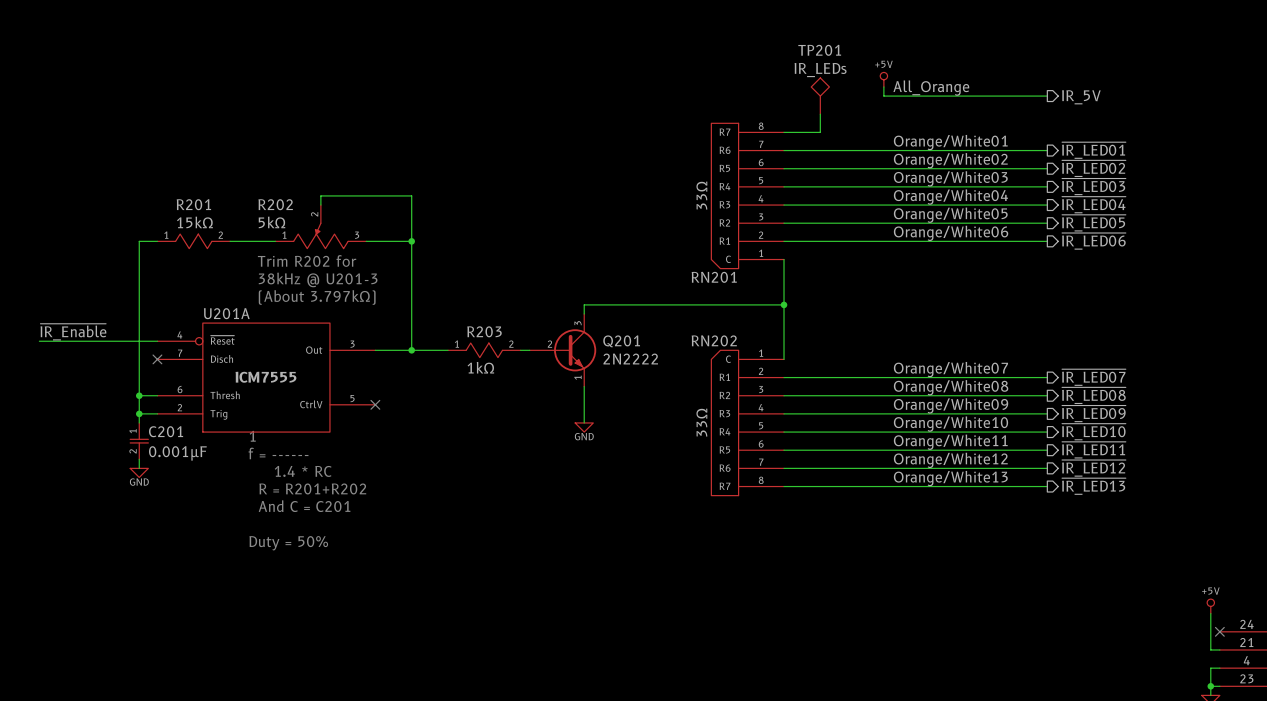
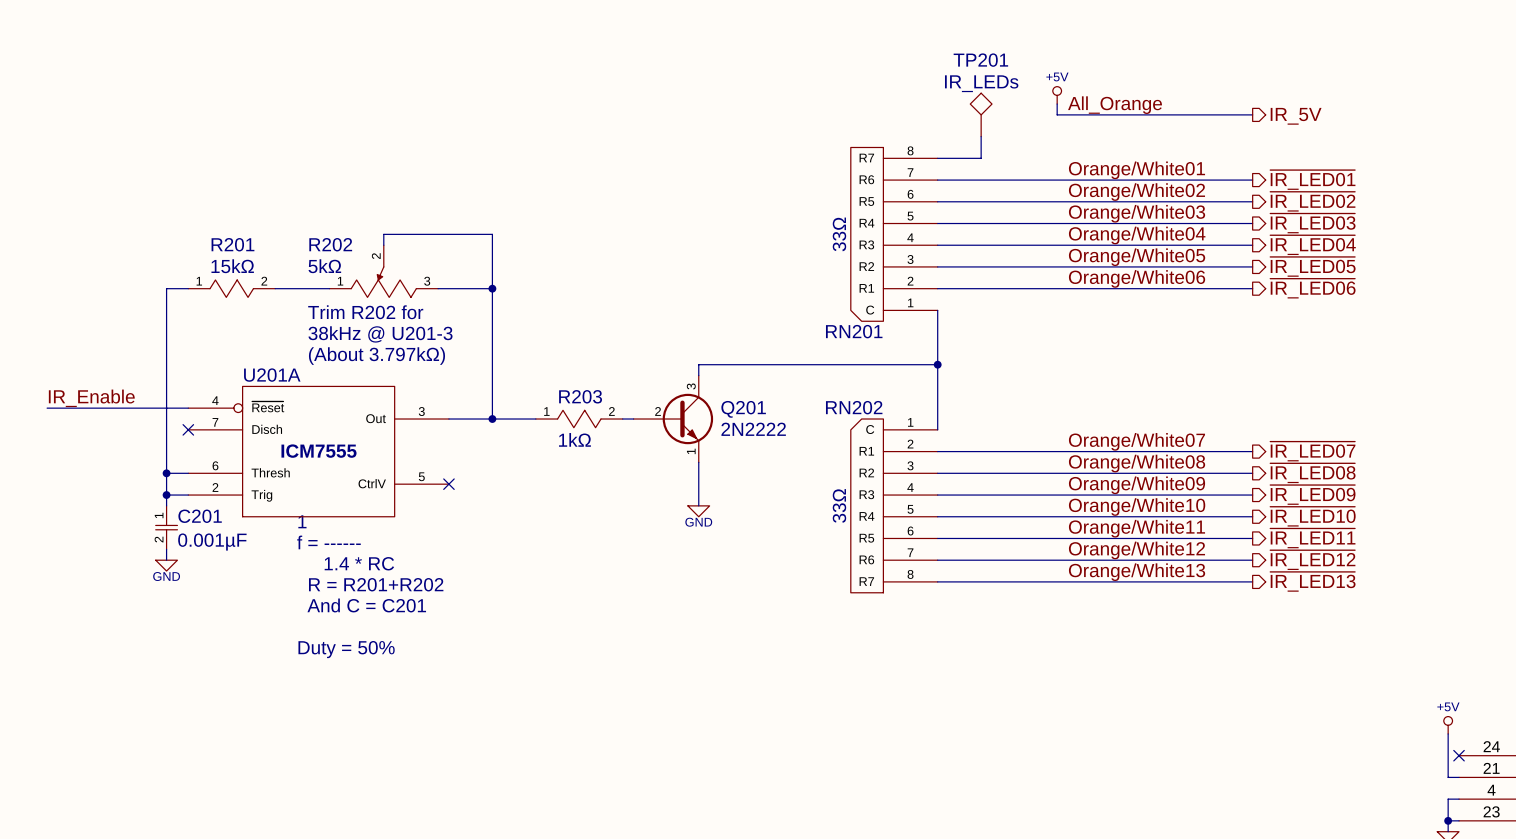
label: ~{IR_Enable} (73, 332) -> IR_Enable (91, 398)

